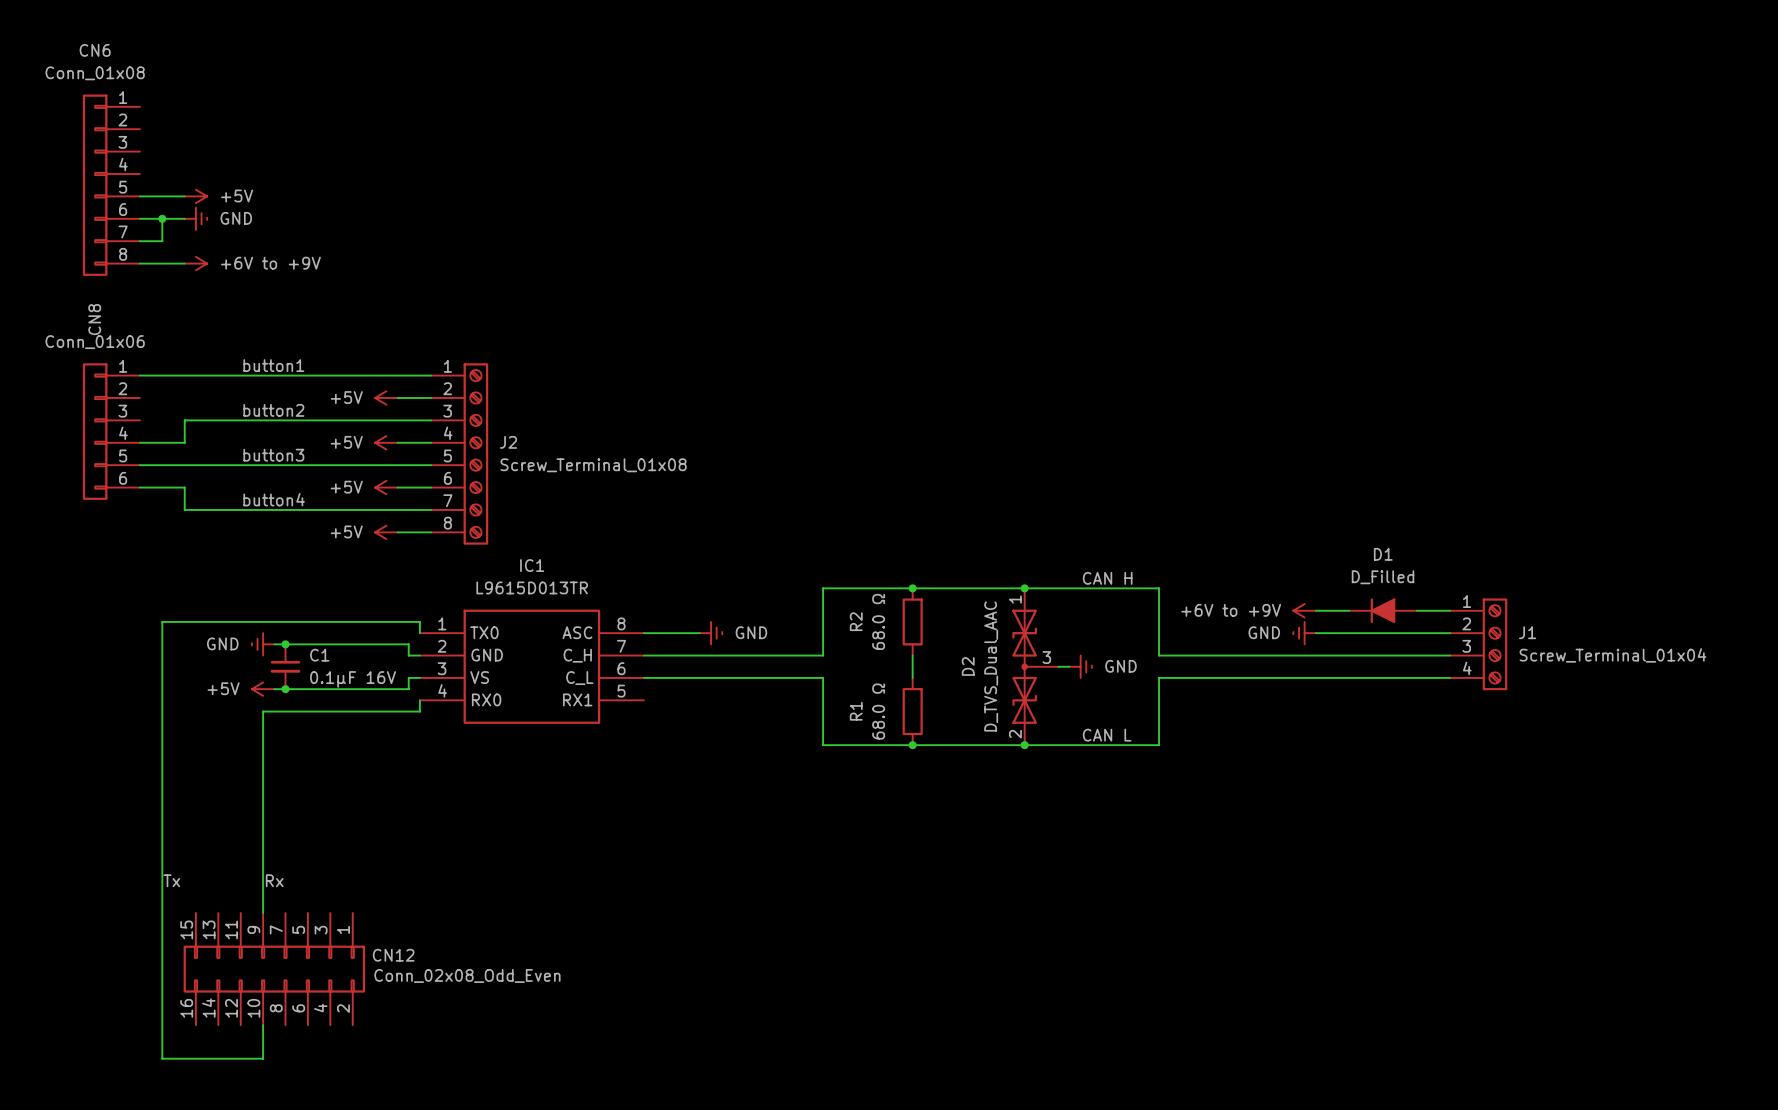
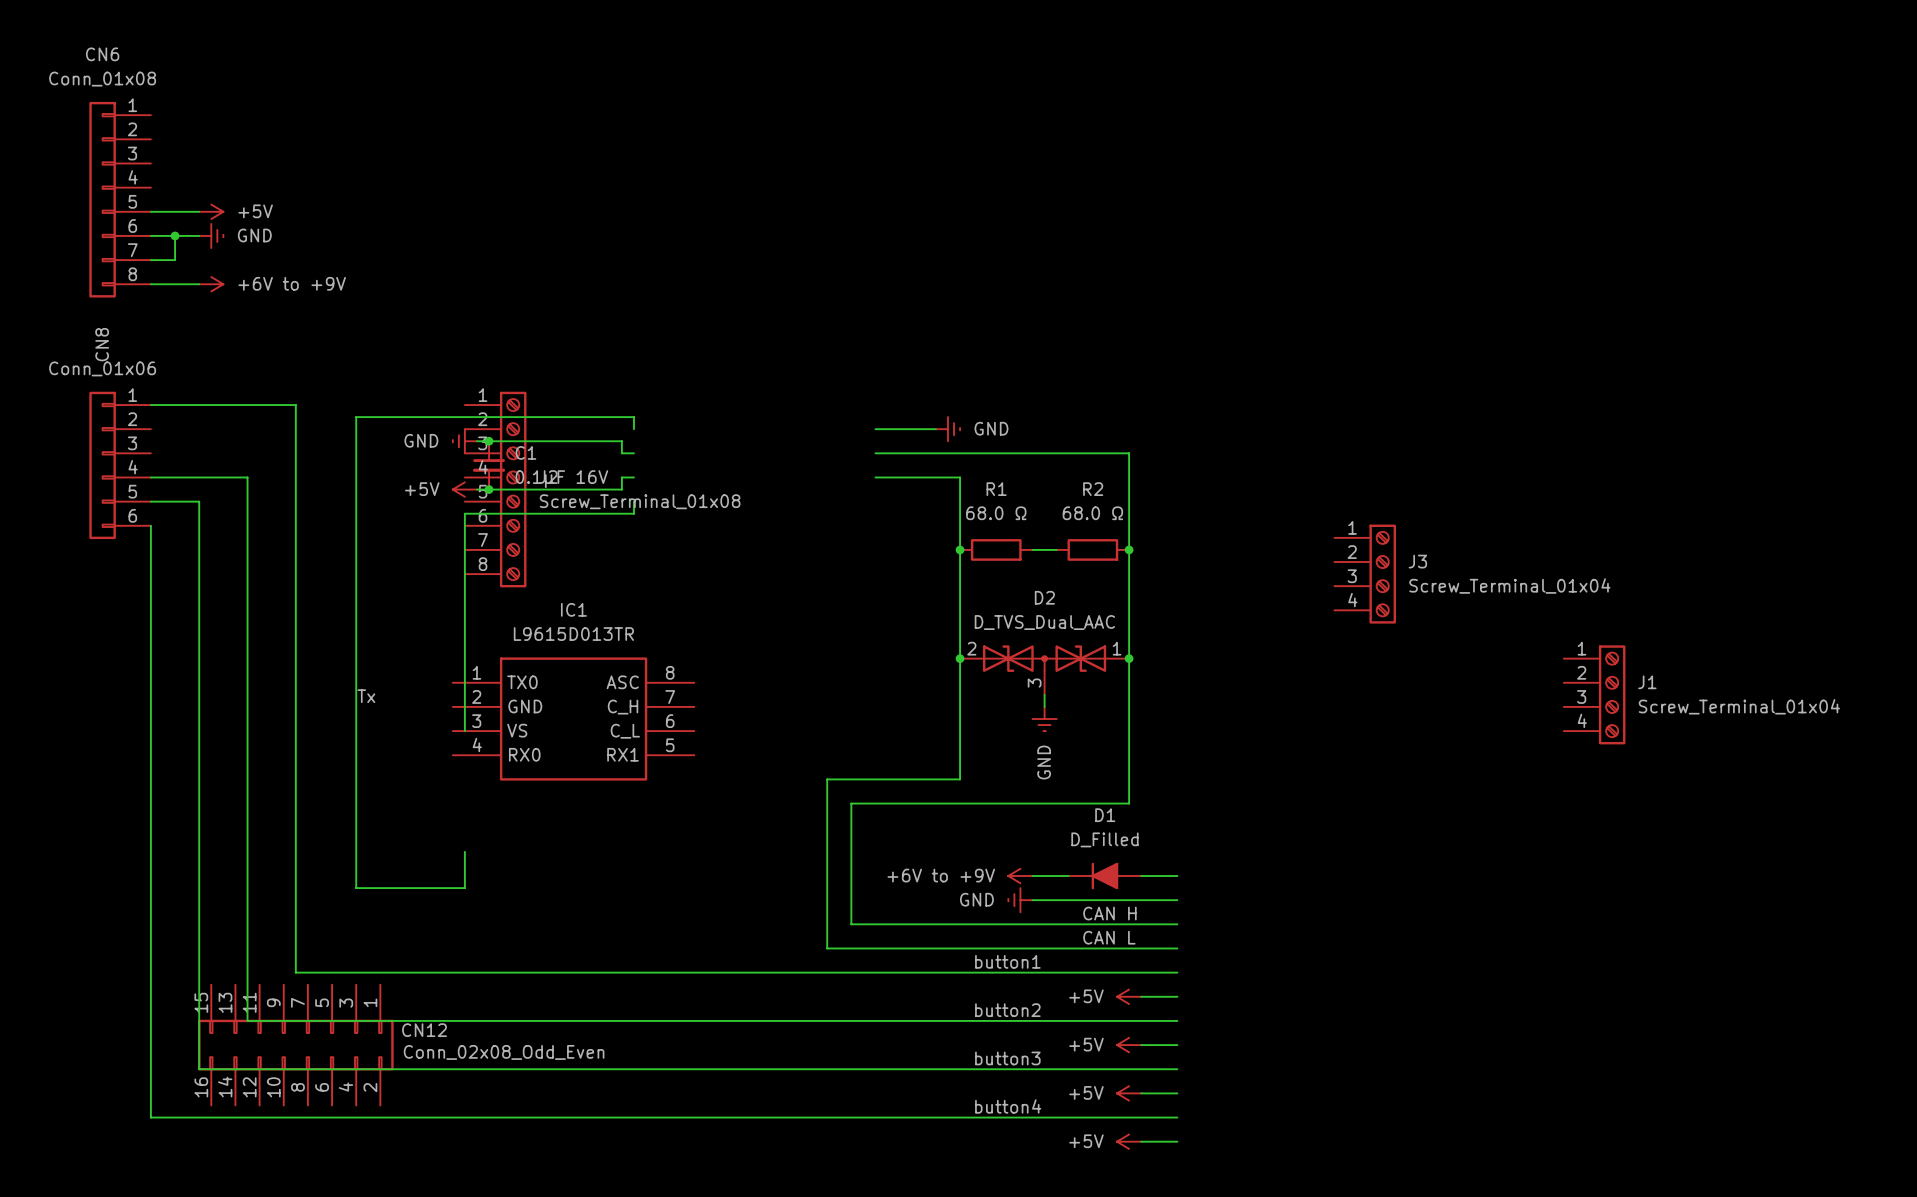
label: button1 (273, 365) -> none
wire: (274, 375) (431, 375) -> (295, 405) (295, 972) (1177, 972)
power symbol: +5V (386, 397) -> none
wire: (397, 397) (431, 397) -> none
wire: none -> (633, 429) (633, 417) (356, 417) (356, 888) (464, 888) (464, 851)
wire: none -> (875, 429) (935, 429)
power symbol: none -> GND (947, 429)
power symbol: none -> GND (464, 441)
wire: none -> (476, 441) (621, 441) (621, 453) (633, 453)
junction: none -> (489, 441)
label: button2 (273, 410) -> none
wire: (431, 420) (184, 420) (184, 442) -> (1177, 1020) (247, 1020) (247, 477) (199, 477)
power symbol: +5V (386, 442) -> none
wire: (397, 442) (431, 442) -> none
wire: none -> (633, 477) (621, 477) (621, 489) (476, 489)
wire: none -> (875, 477) (960, 477) (960, 779) (827, 779) (827, 948) (1177, 948)
power symbol: none -> +5V (464, 489)
junction: none -> (489, 489)
label: button3 (273, 455) -> none
wire: (184, 465) (431, 465) -> none
wire: none -> (633, 501) (633, 513) (464, 513) (464, 731)
wire: (139, 487) (184, 487) -> (199, 501) (199, 525)
wire: none -> (150, 525) (150, 1117) (1177, 1117)
power symbol: +5V (386, 487) -> none
wire: (397, 487) (431, 487) -> none
label: button4 (274, 499) -> none
wire: (184, 509) (431, 509) -> (199, 549) (199, 1069) (1177, 1069)
junction: none -> (960, 549)
wire: none -> (1032, 549) (1056, 549)
junction: none -> (1129, 549)
power symbol: +5V (386, 532) -> none
wire: (397, 532) (431, 532) -> none
J3: none -> Screw_Terminal_01x04 (1365, 574)
label: CAN H (1107, 578) -> none
junction position: (912, 588) -> (960, 658)
junction position: (1024, 588) -> (1129, 658)
power symbol: +6V to +9V (1304, 610) -> none
wire: (1315, 610) (1349, 610) -> none
D1 position: (1383, 610) -> (1104, 876)
wire: (1416, 610) (1450, 610) -> none
R2 rotation: 0° (912, 621) -> 90° clockwise (1092, 549)
R2 position: (912, 621) -> (1092, 549)
wire: (419, 633) (419, 621) (162, 621) (162, 1058) (263, 1058) (263, 1025) -> none
wire: (643, 633) (699, 633) -> none
power symbol: GND (711, 633) -> none
power symbol: GND (1304, 633) -> none
wire: (1315, 633) (1450, 633) -> none
power symbol: GND (263, 644) -> none
wire: (274, 644) (408, 644) (408, 655) (419, 655) -> none
junction: (285, 644) -> none
wire: none -> (1044, 694) (1044, 706)
label: none -> Tx (366, 696)
wire: (643, 655) (823, 655) (823, 588) (1159, 588) (1159, 655) (1450, 655) -> none
wire: (912, 655) (912, 677) -> none
C1 position: (285, 666) -> (489, 465)
power symbol: none -> GND (1044, 719)
D2 rotation: 0° (1024, 666) -> 90° clockwise (1044, 658)
wire: (1058, 666) (1069, 666) -> none
power symbol: GND (1080, 666) -> none
wire: (419, 677) (408, 677) (408, 689) (274, 689) -> none
wire: (643, 677) (823, 677) (823, 745) -> (1177, 924) (851, 924) (851, 803) (887, 803)
wire: (1450, 677) (1159, 677) (1159, 745) (1047, 745) -> (875, 453) (1129, 453) (1129, 803)
power symbol: +5V (263, 689) -> none
junction: (285, 689) -> none
wire: (419, 700) (419, 711) (263, 711) (263, 913) -> none
R1 rotation: 0° (912, 711) -> 90° clockwise (996, 549)
R1 position: (912, 711) -> (996, 549)
label position: CAN L (1107, 735) -> CAN L (1109, 937)
junction: (912, 745) -> none
junction: (1024, 745) -> none
power symbol: none -> +6V to +9V (1020, 876)
wire: none -> (1032, 876) (1068, 876)
wire: none -> (1141, 876) (1177, 876)
power symbol: none -> GND (1020, 900)
wire: none -> (1032, 900) (1177, 900)
label: none -> CAN H (1109, 913)
label: Tx (171, 880) -> none
label: Rx (274, 880) -> none
label: none -> button1 (1007, 961)
power symbol: none -> +5V (1129, 996)
wire: none -> (1141, 996) (1177, 996)
label: none -> button2 (1007, 1010)
power symbol: none -> +5V (1129, 1045)
wire: none -> (1141, 1045) (1177, 1045)
label: none -> button3 (1007, 1058)
power symbol: none -> +5V (1129, 1093)
wire: none -> (1141, 1093) (1177, 1093)
label: none -> button4 (1008, 1106)
power symbol: none -> +5V (1129, 1141)
wire: none -> (1141, 1141) (1177, 1141)

